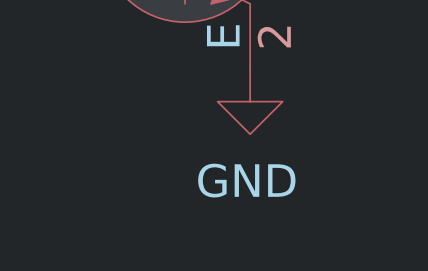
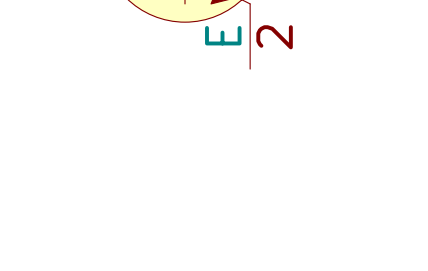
power symbol: GND (250, 101) -> none

